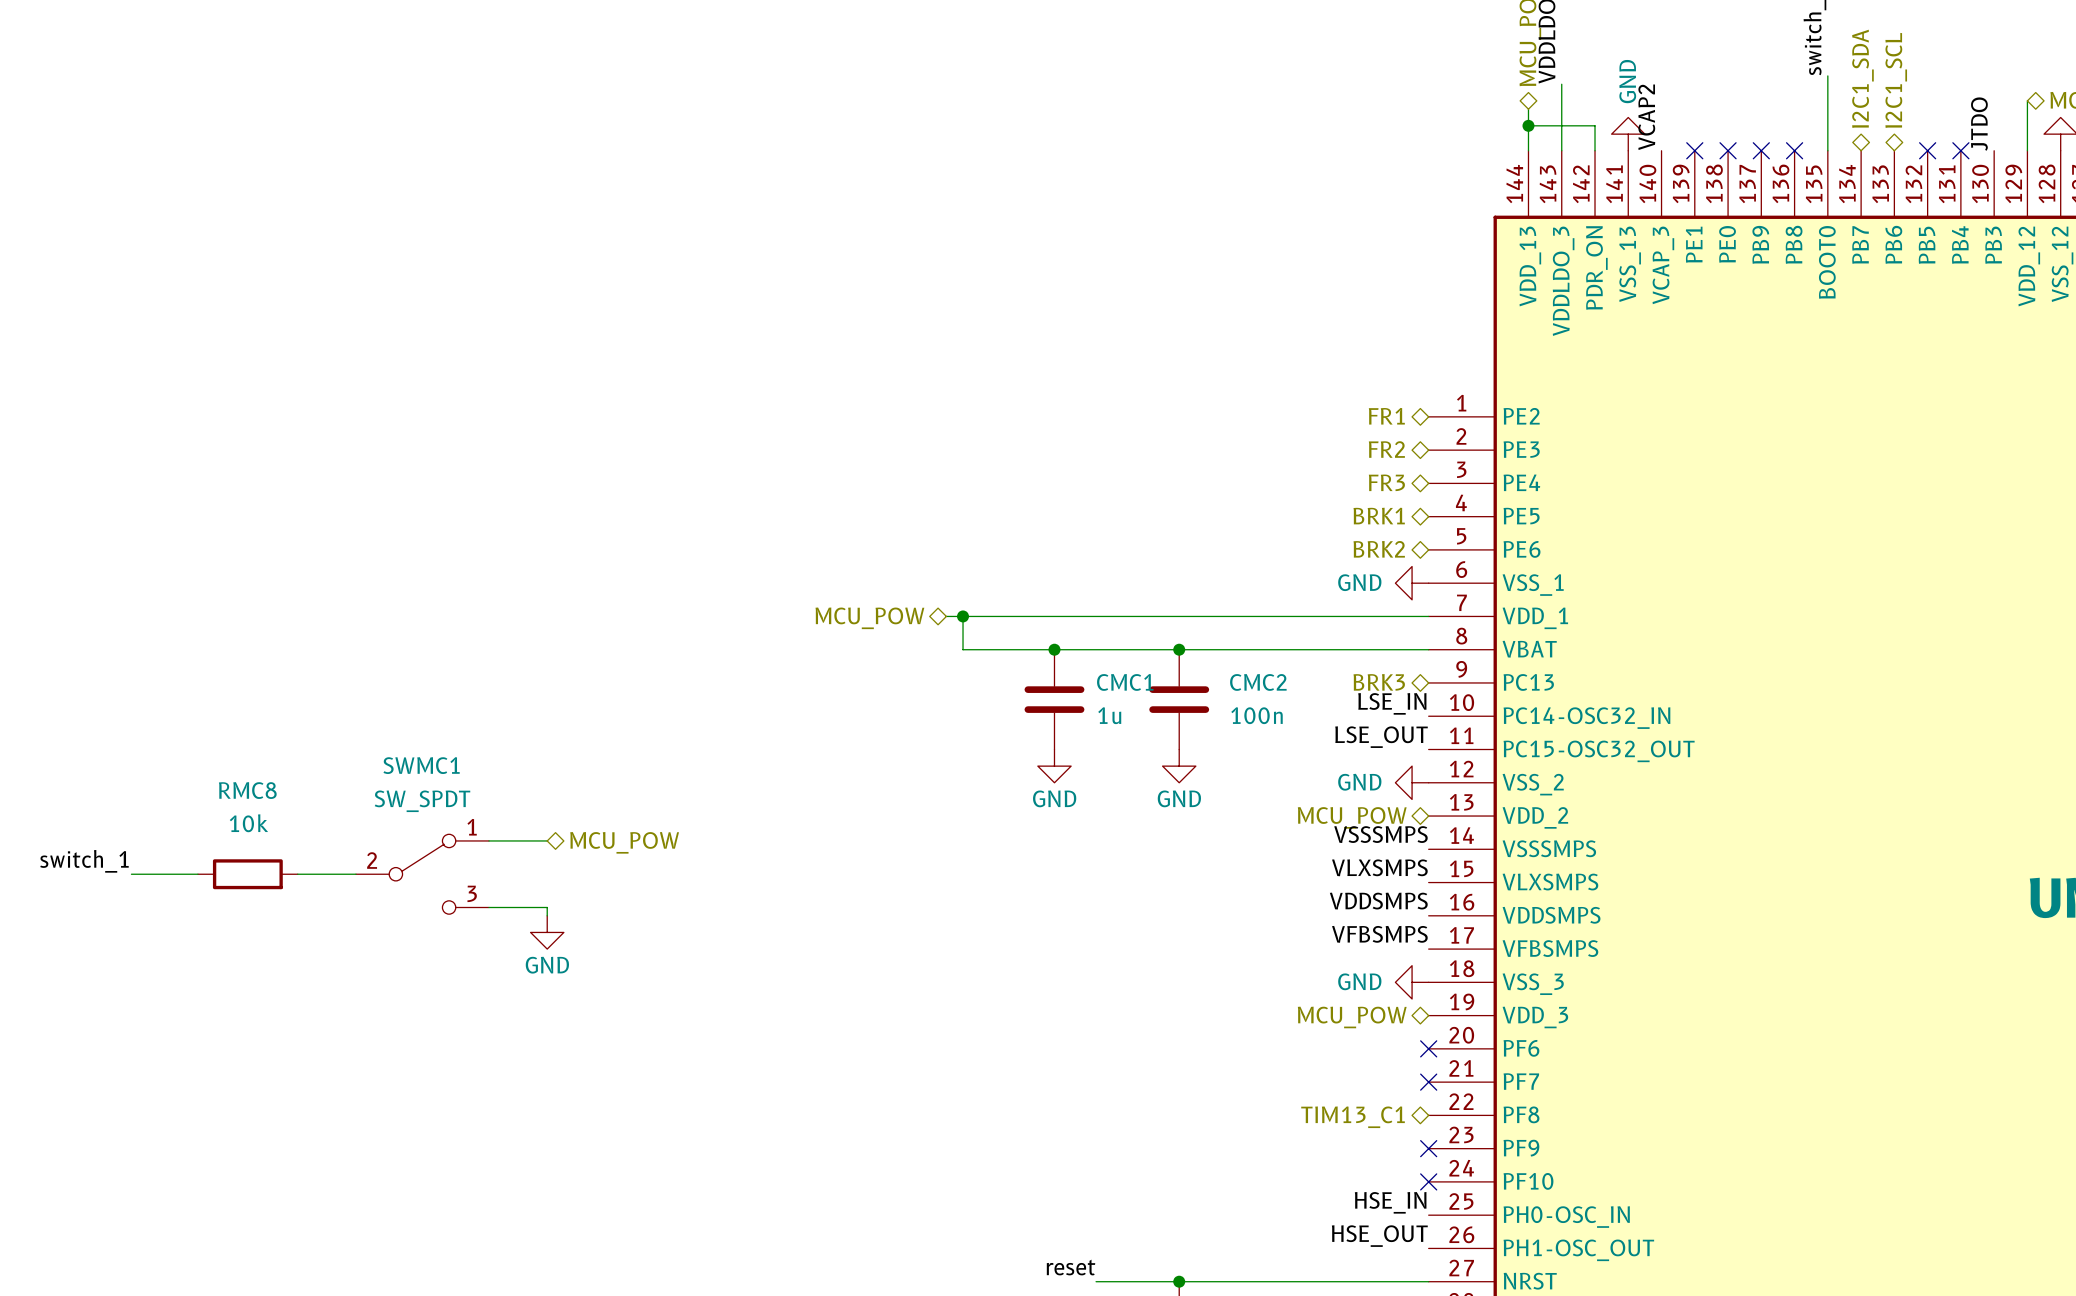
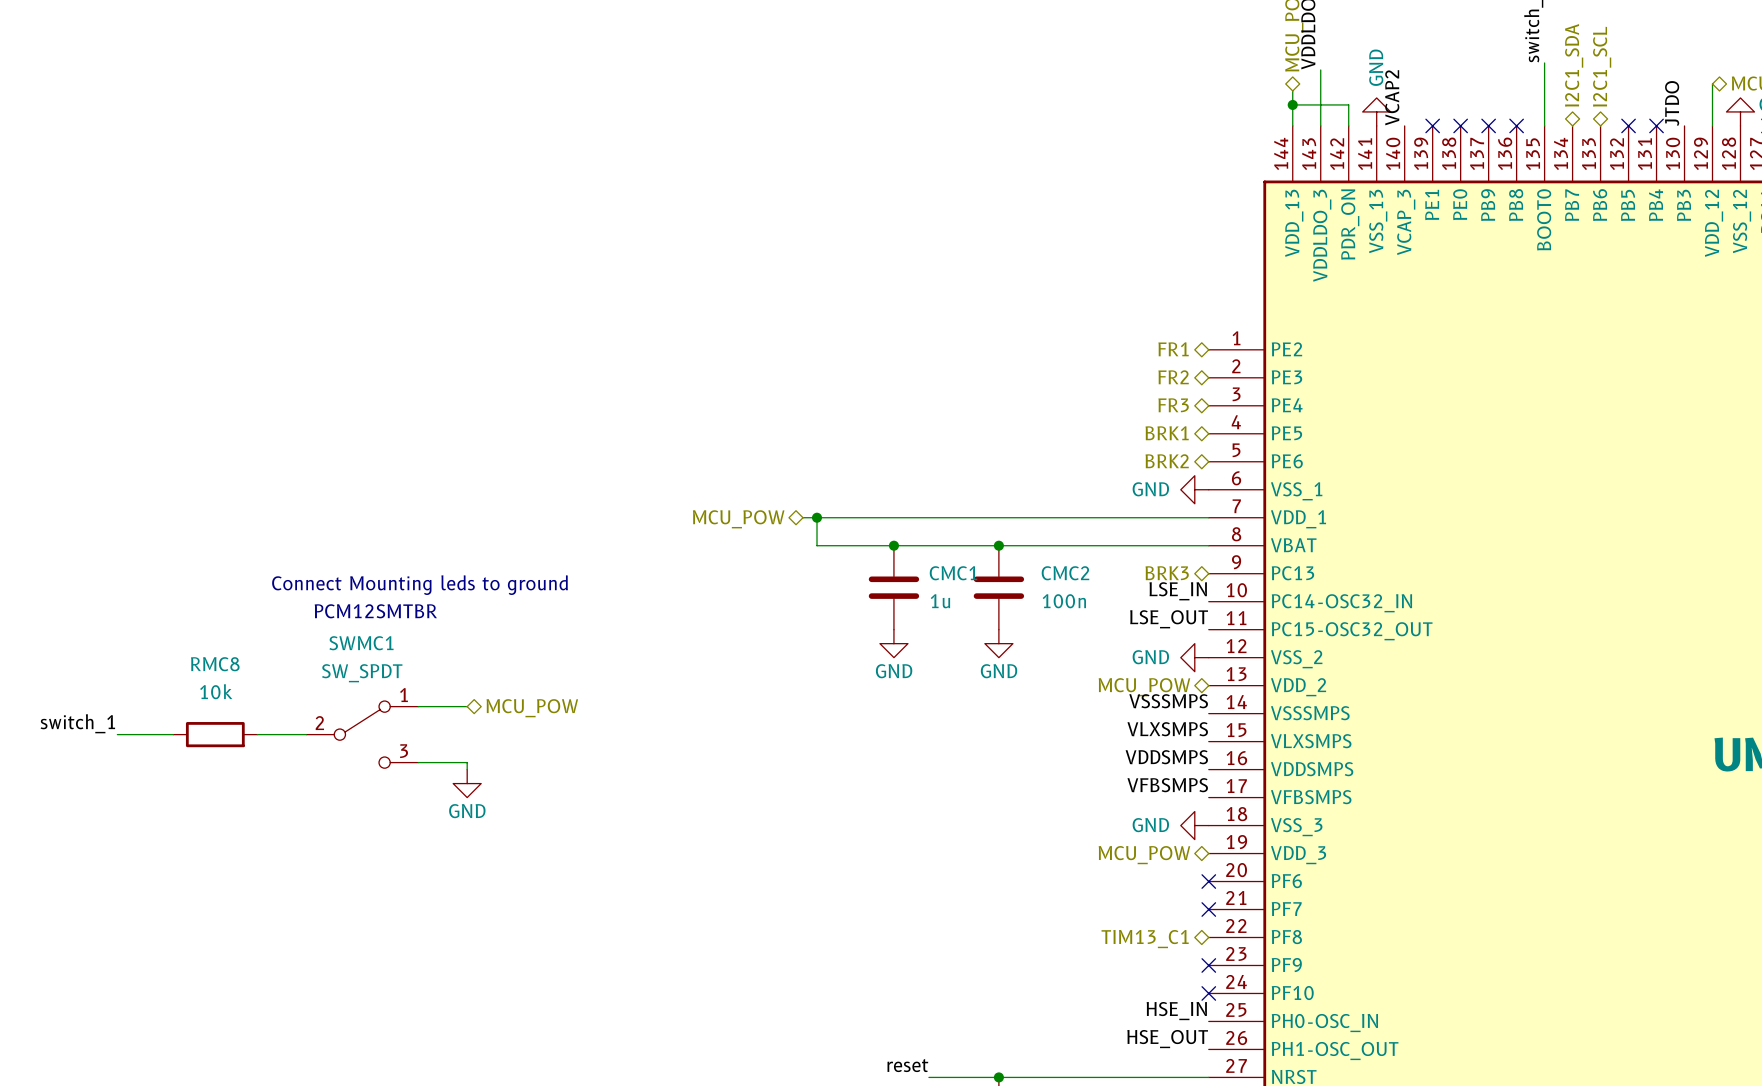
text: none -> Connect Mounting leds to ground (420, 585)
text: none -> PCM12SMTBR (375, 611)

